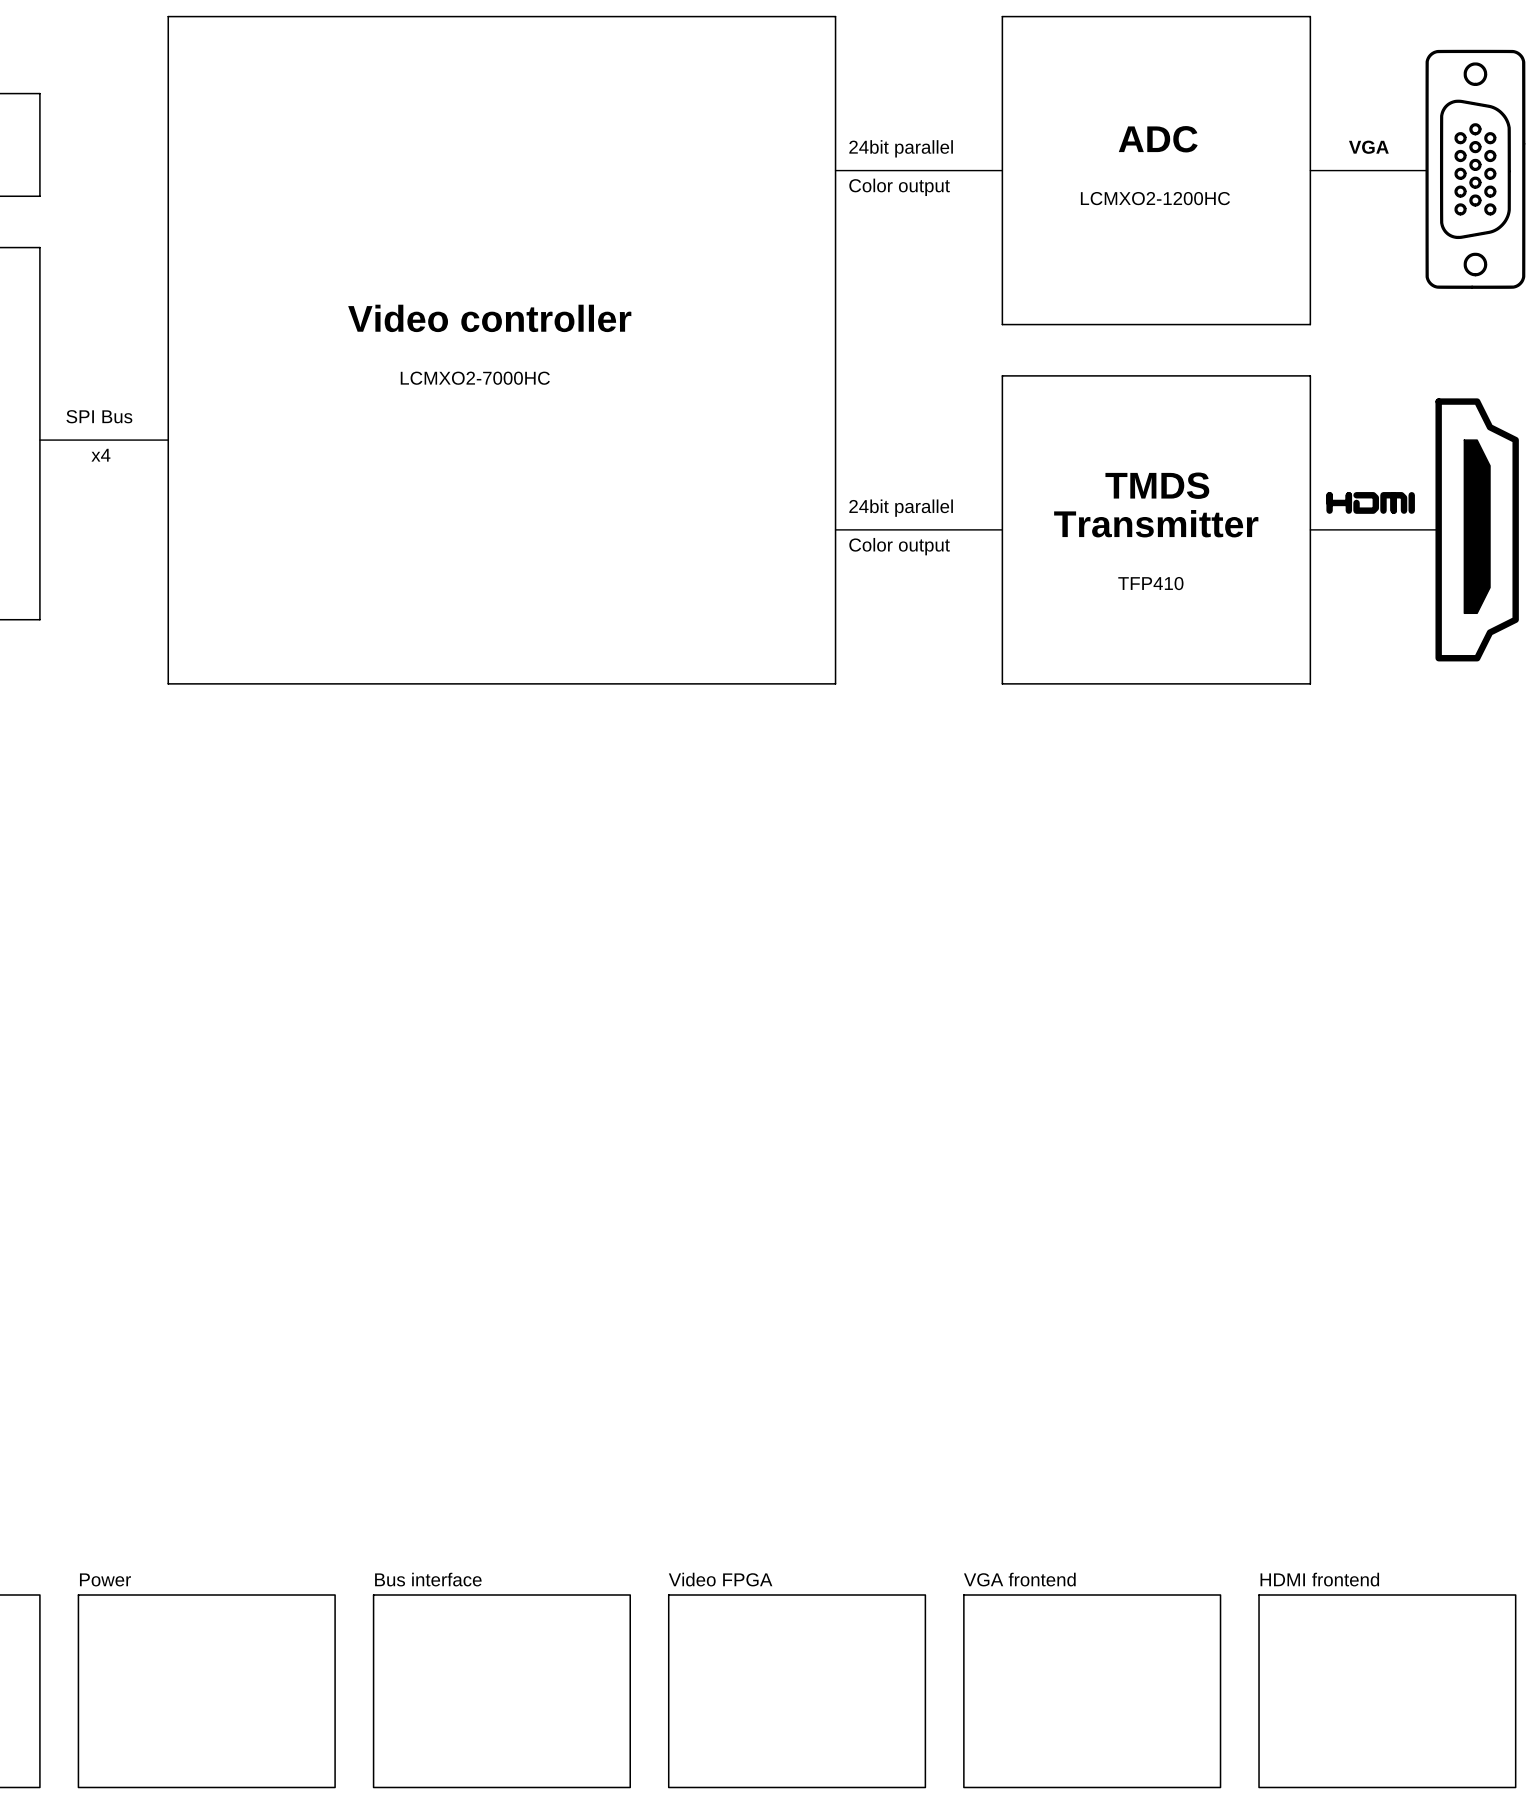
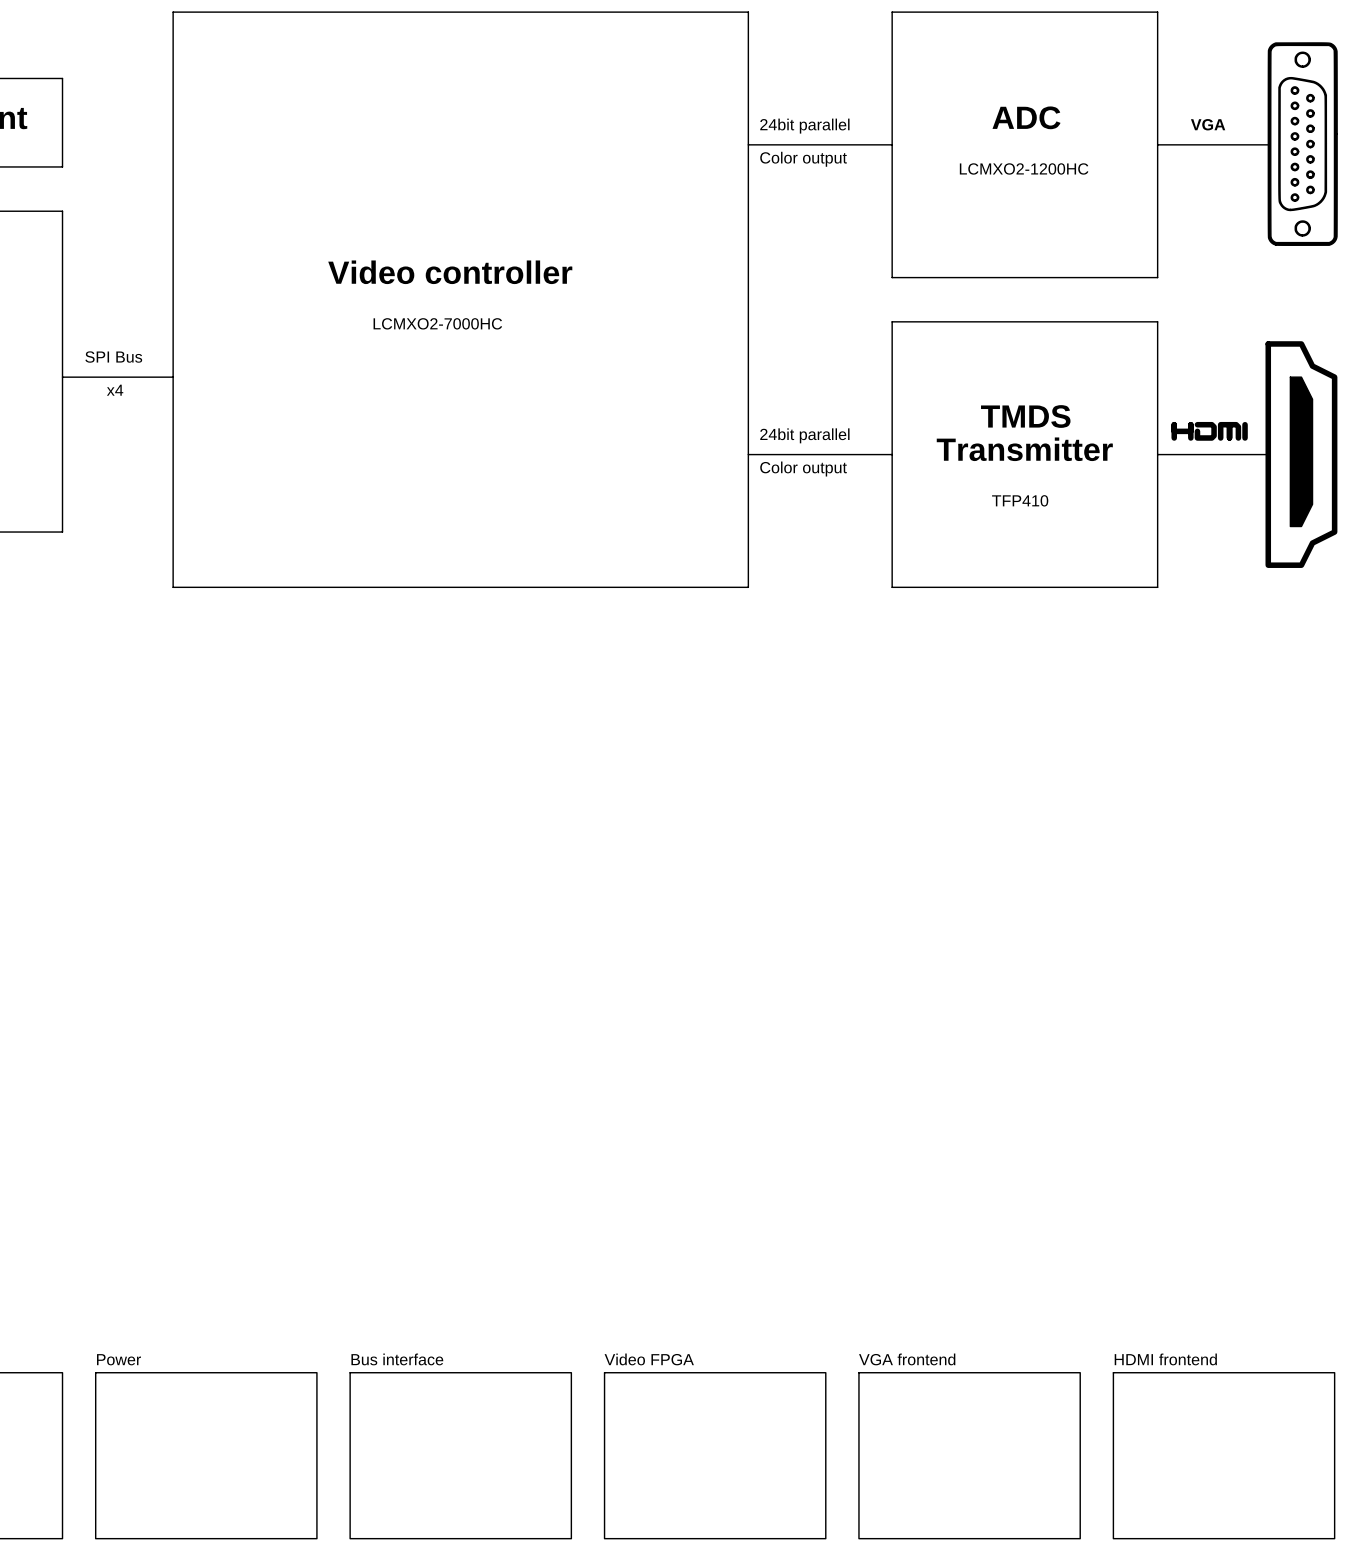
power symbol shape: [1426, 50, 1525, 289] -> [1268, 42, 1338, 246]
line: none -> (1257, 144) (1268, 144)

